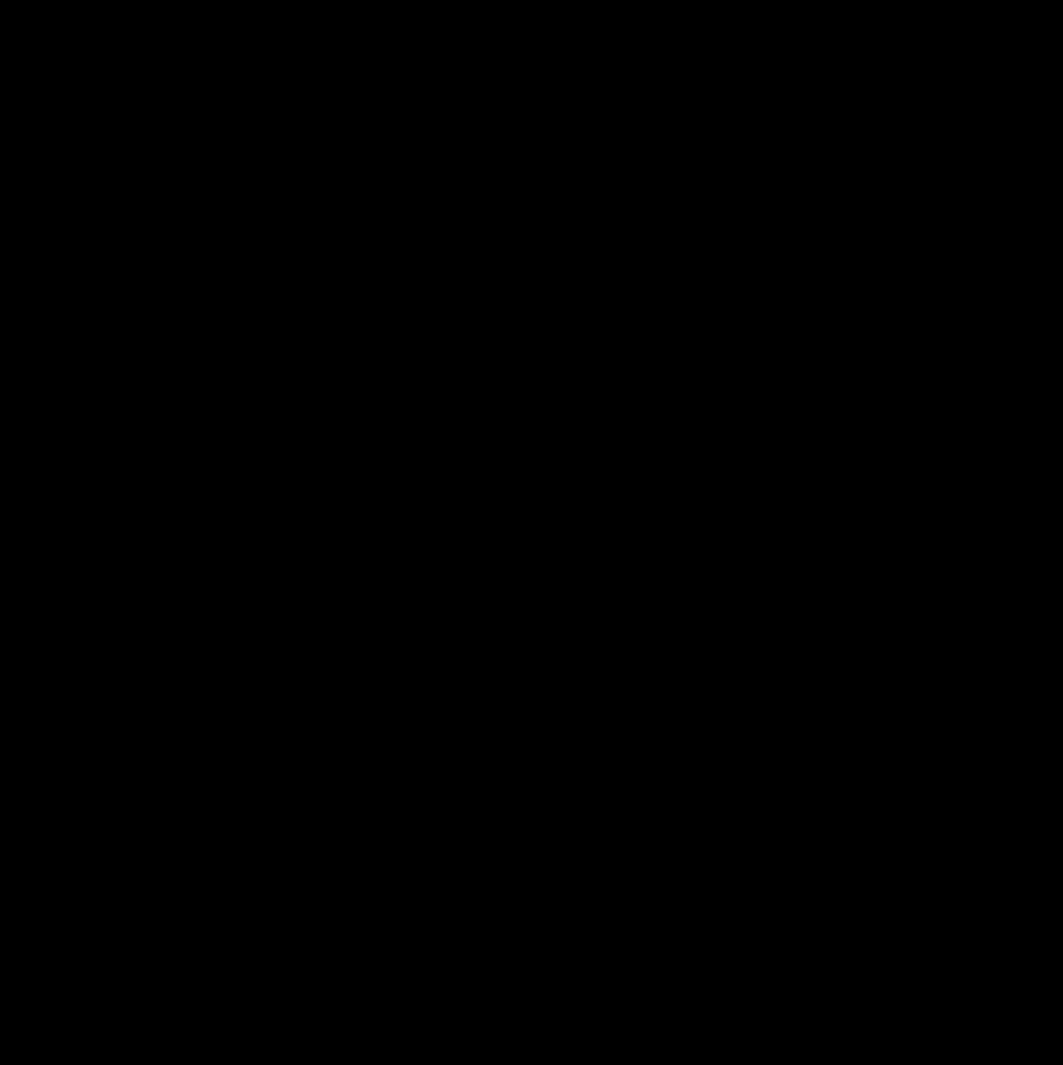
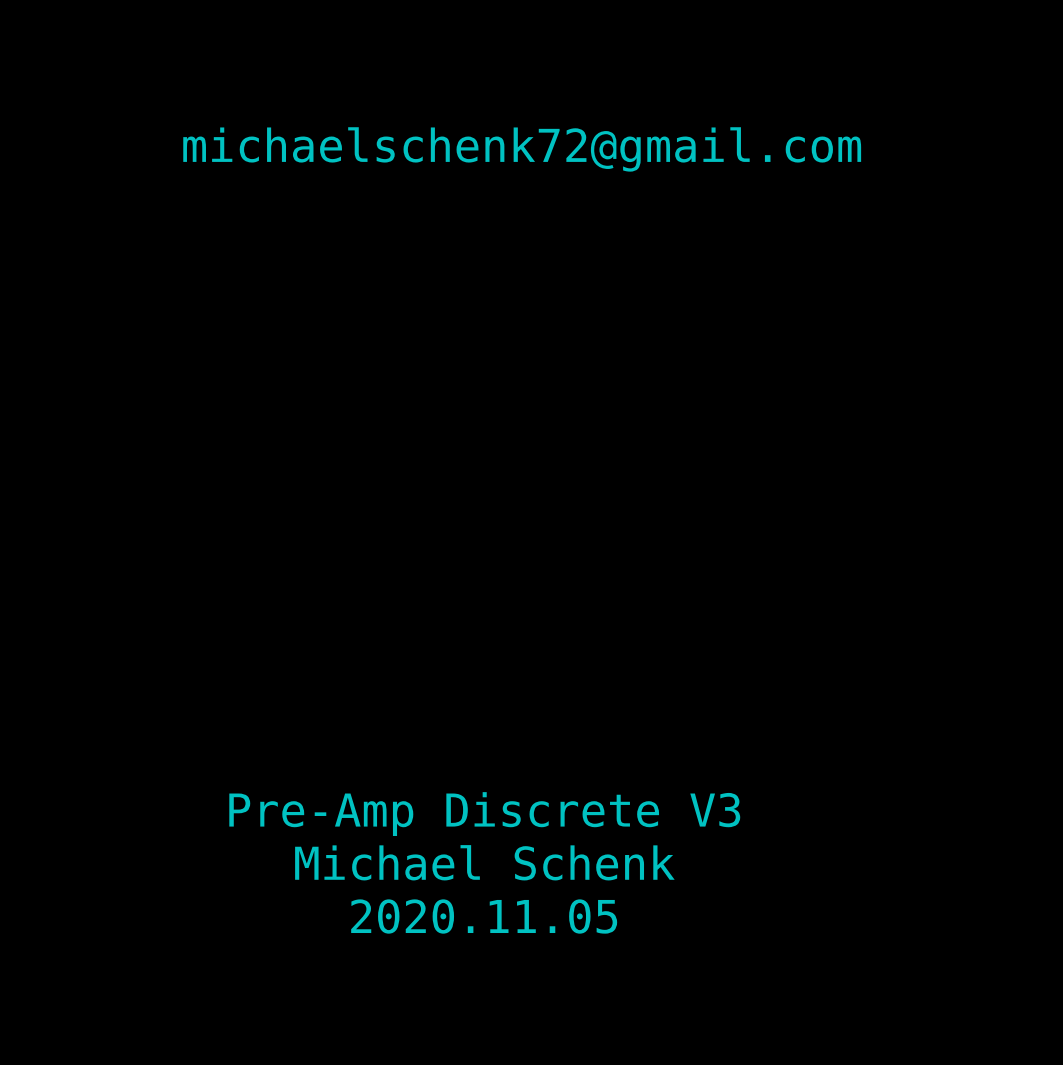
text: none -> michaelschenk72@gmail.com (522, 149)
text: none -> Pre-Amp Discrete V3 (484, 814)
text: none -> Michael Schenk (484, 862)
text: none -> 2020.11.05 (484, 916)

